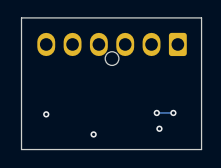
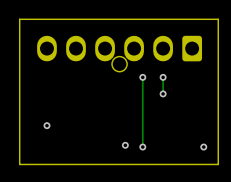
track: none -> (142, 77) (142, 147)
via: none -> (142, 77)
track: none -> (163, 77) (163, 93)
via: none -> (163, 77)
via: none -> (163, 93)
via: (156, 112) -> none
track: (173, 112) (156, 112) -> none
via: (173, 112) -> none
via: (159, 128) -> none
via: none -> (125, 145)
via: none -> (142, 147)
via: none -> (203, 147)
via: (93, 134) -> none

